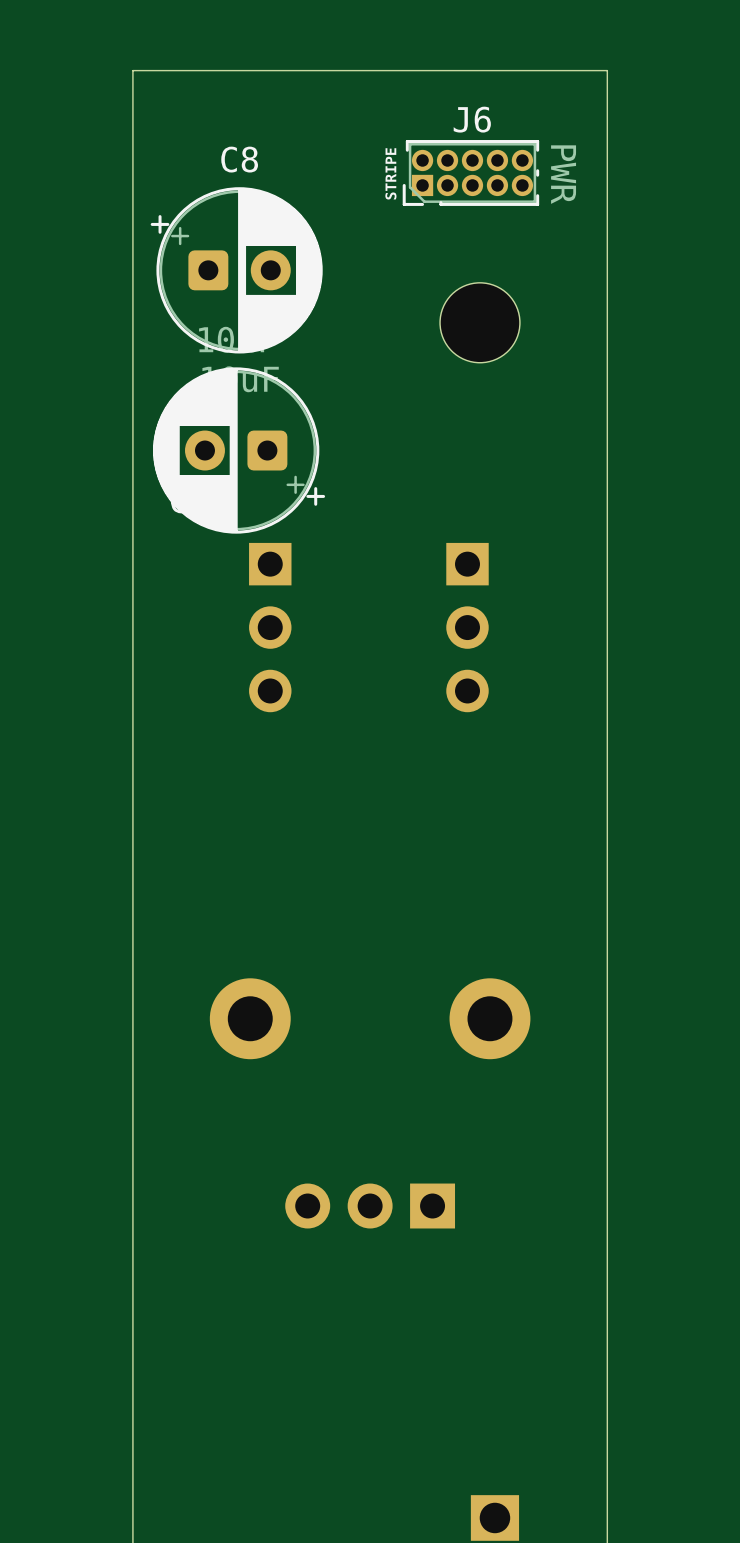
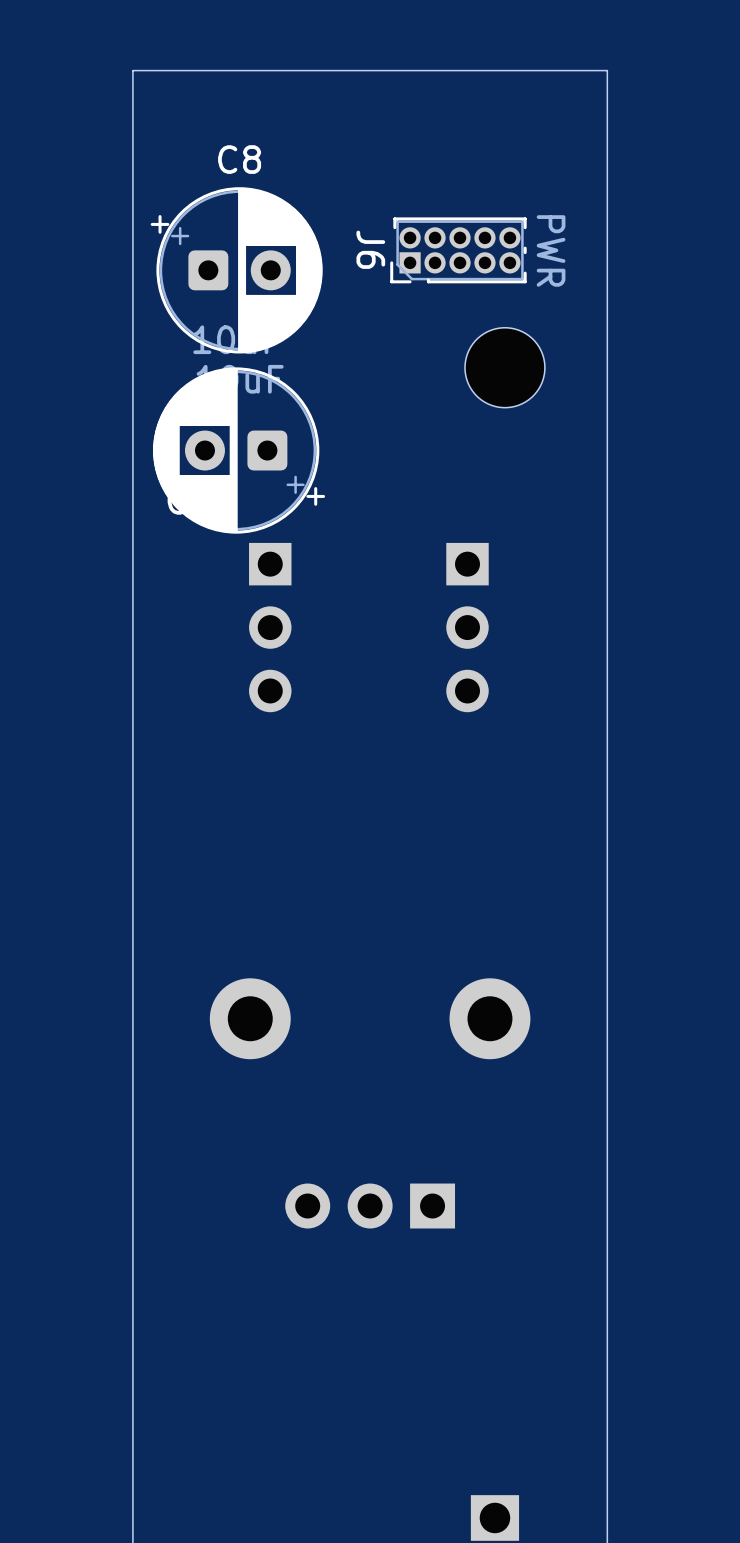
J6 name rotation: 0° (472, 119) -> 90° clockwise (370, 249)
J6 name position: J6 (472, 119) -> J6 (370, 249)
J6 position: (470, 172) -> (458, 250)
text: STRIPE (390, 173) -> none
part position: (479, 322) -> (504, 367)

